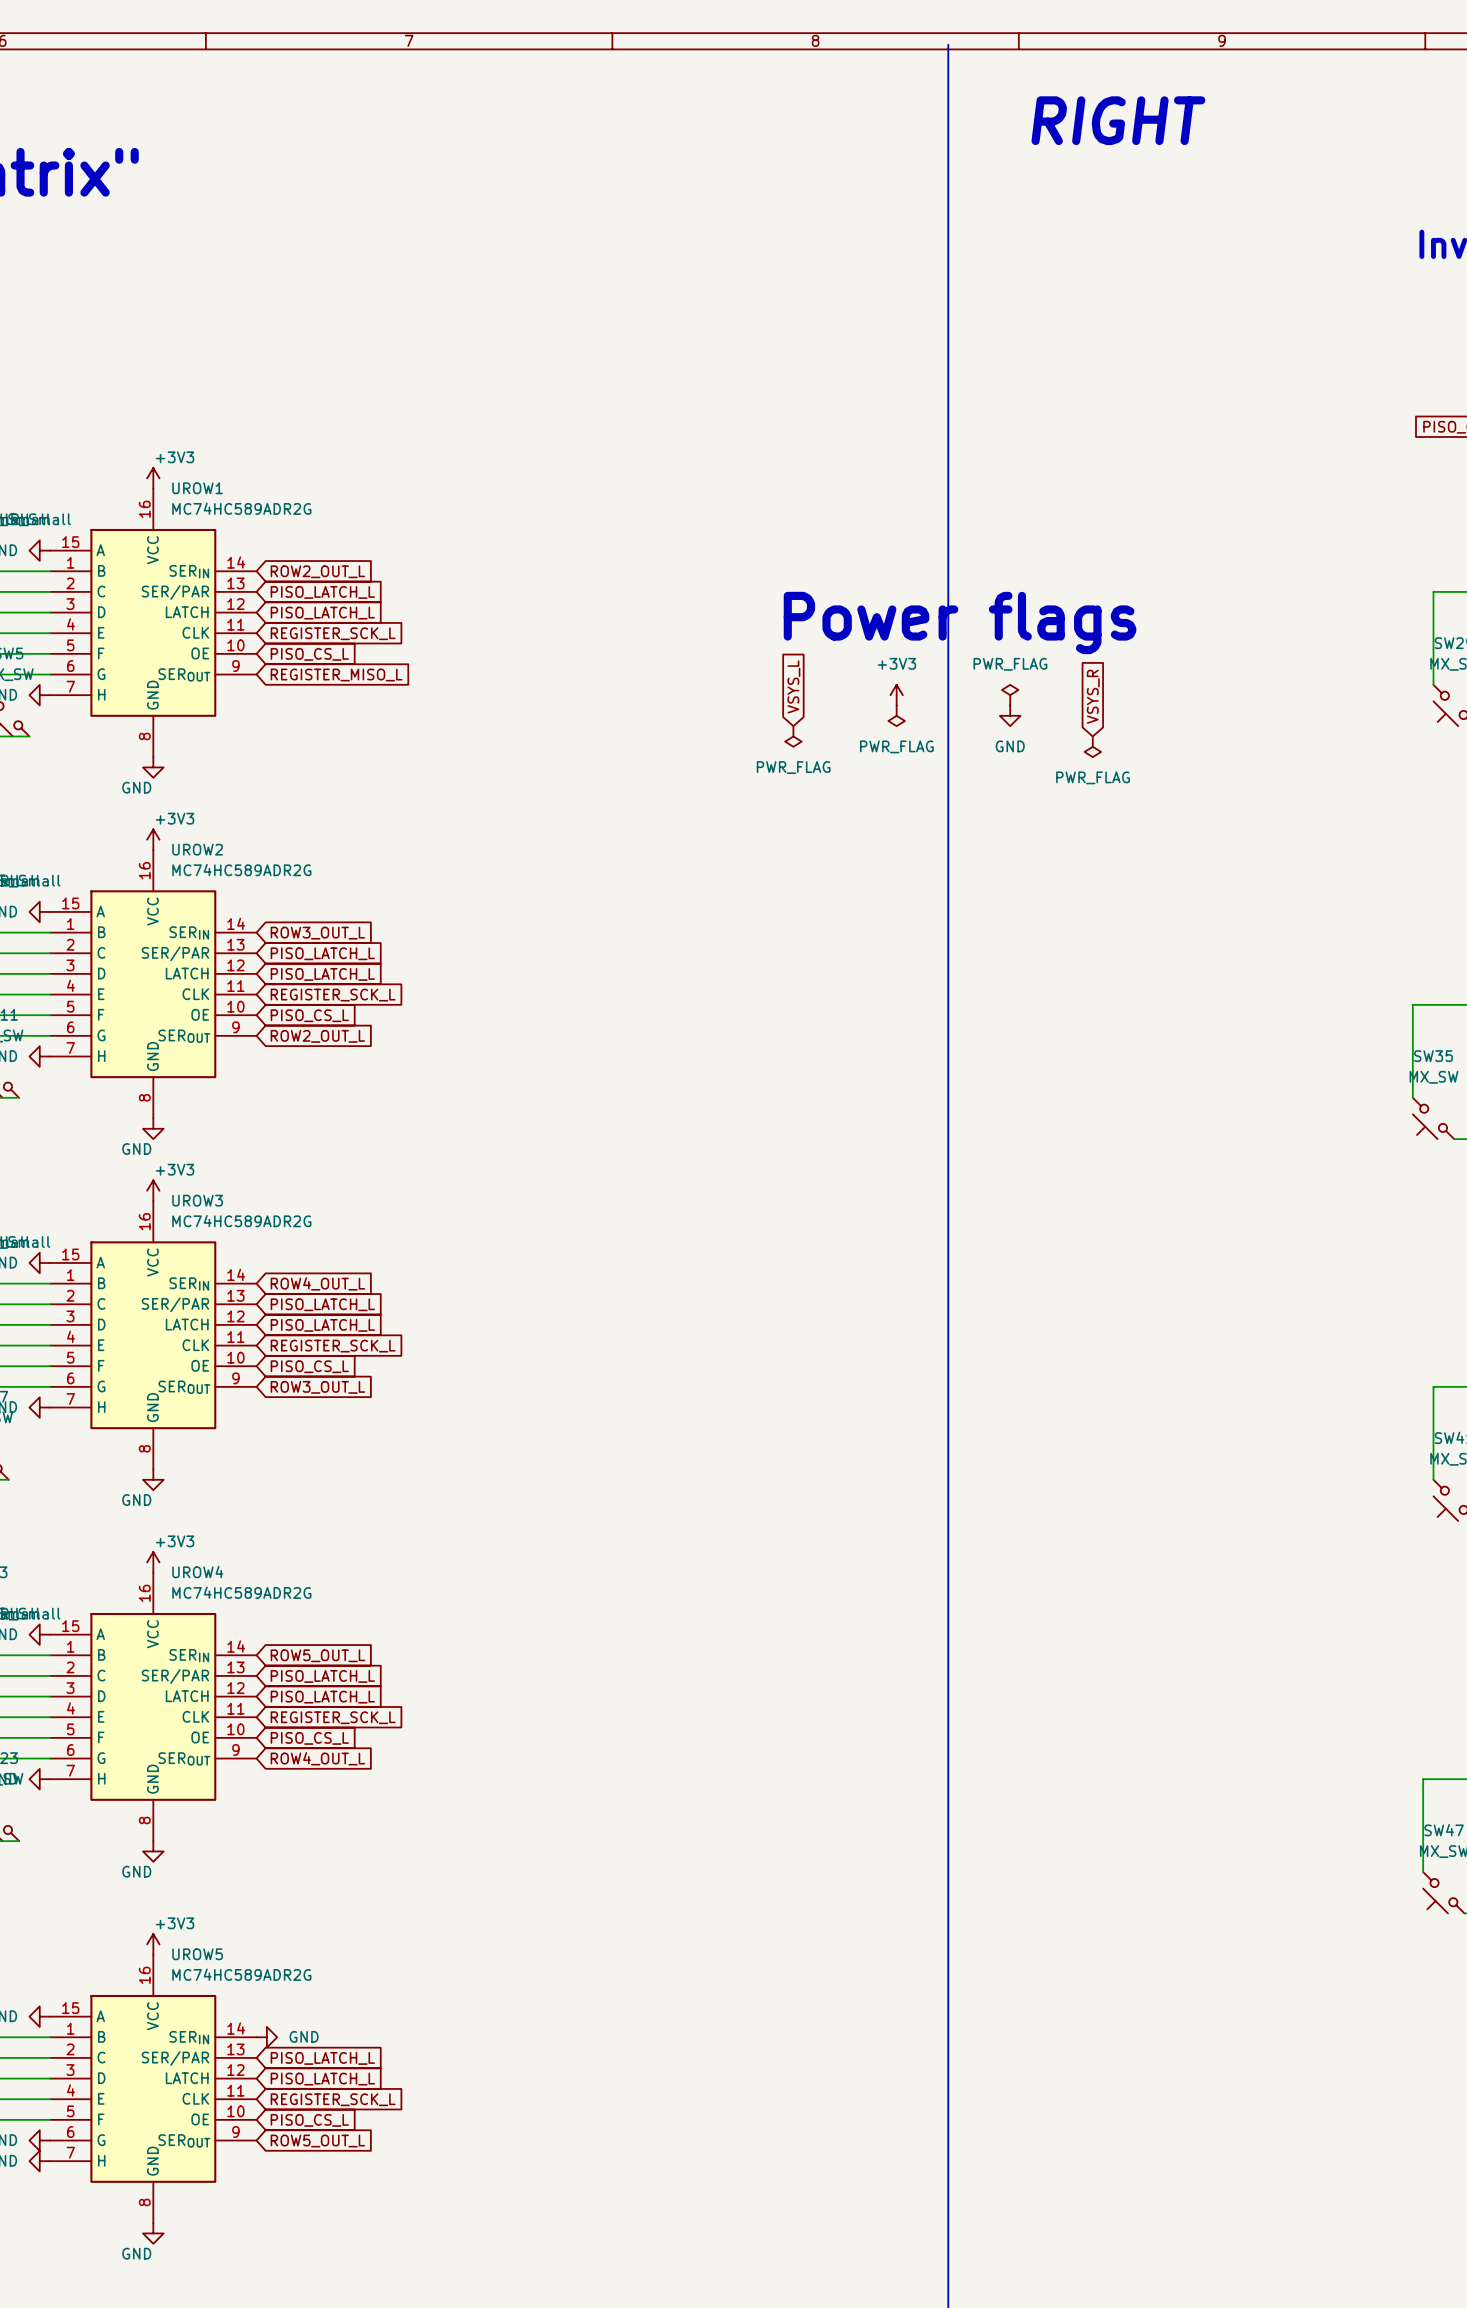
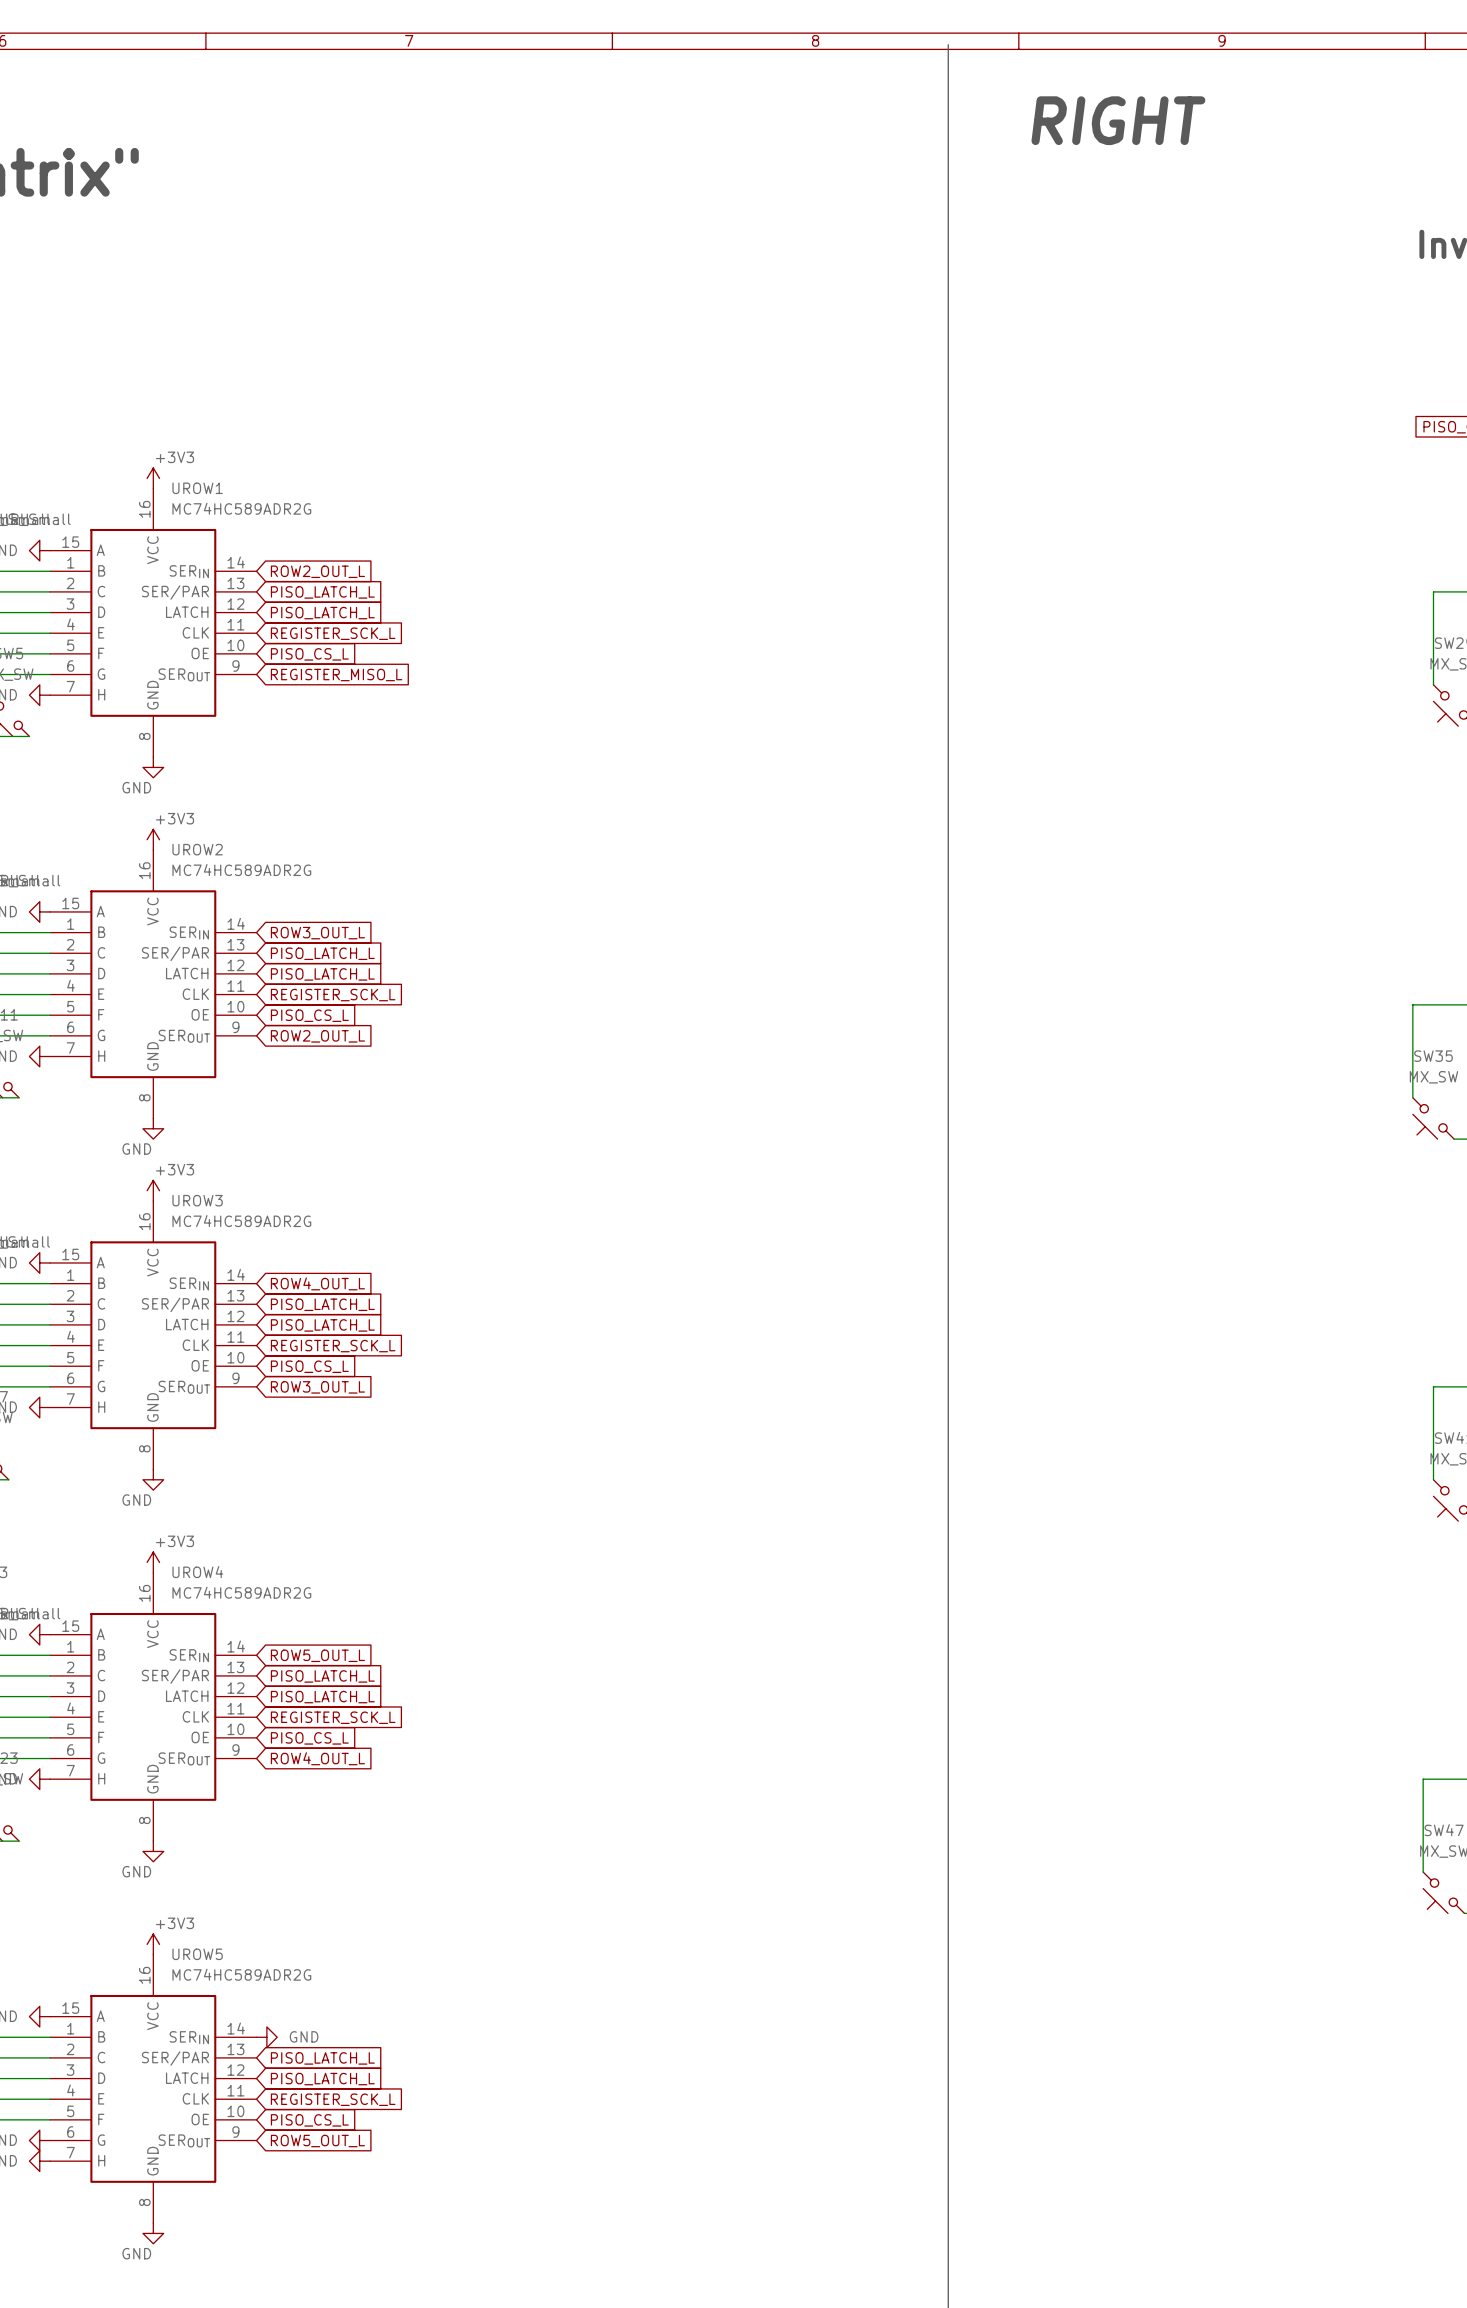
text: Power flags (960, 622) -> none
global label: VSYS_L (793, 686) -> none
power symbol: +3V3 (896, 695) -> none
power symbol: PWR_FLAG (1010, 695) -> none
global label: VSYS_R (1093, 696) -> none
power symbol: PWR_FLAG (896, 715) -> none
power symbol: GND (1010, 715) -> none
power symbol: PWR_FLAG (793, 736) -> none
power symbol: PWR_FLAG (1092, 746) -> none

